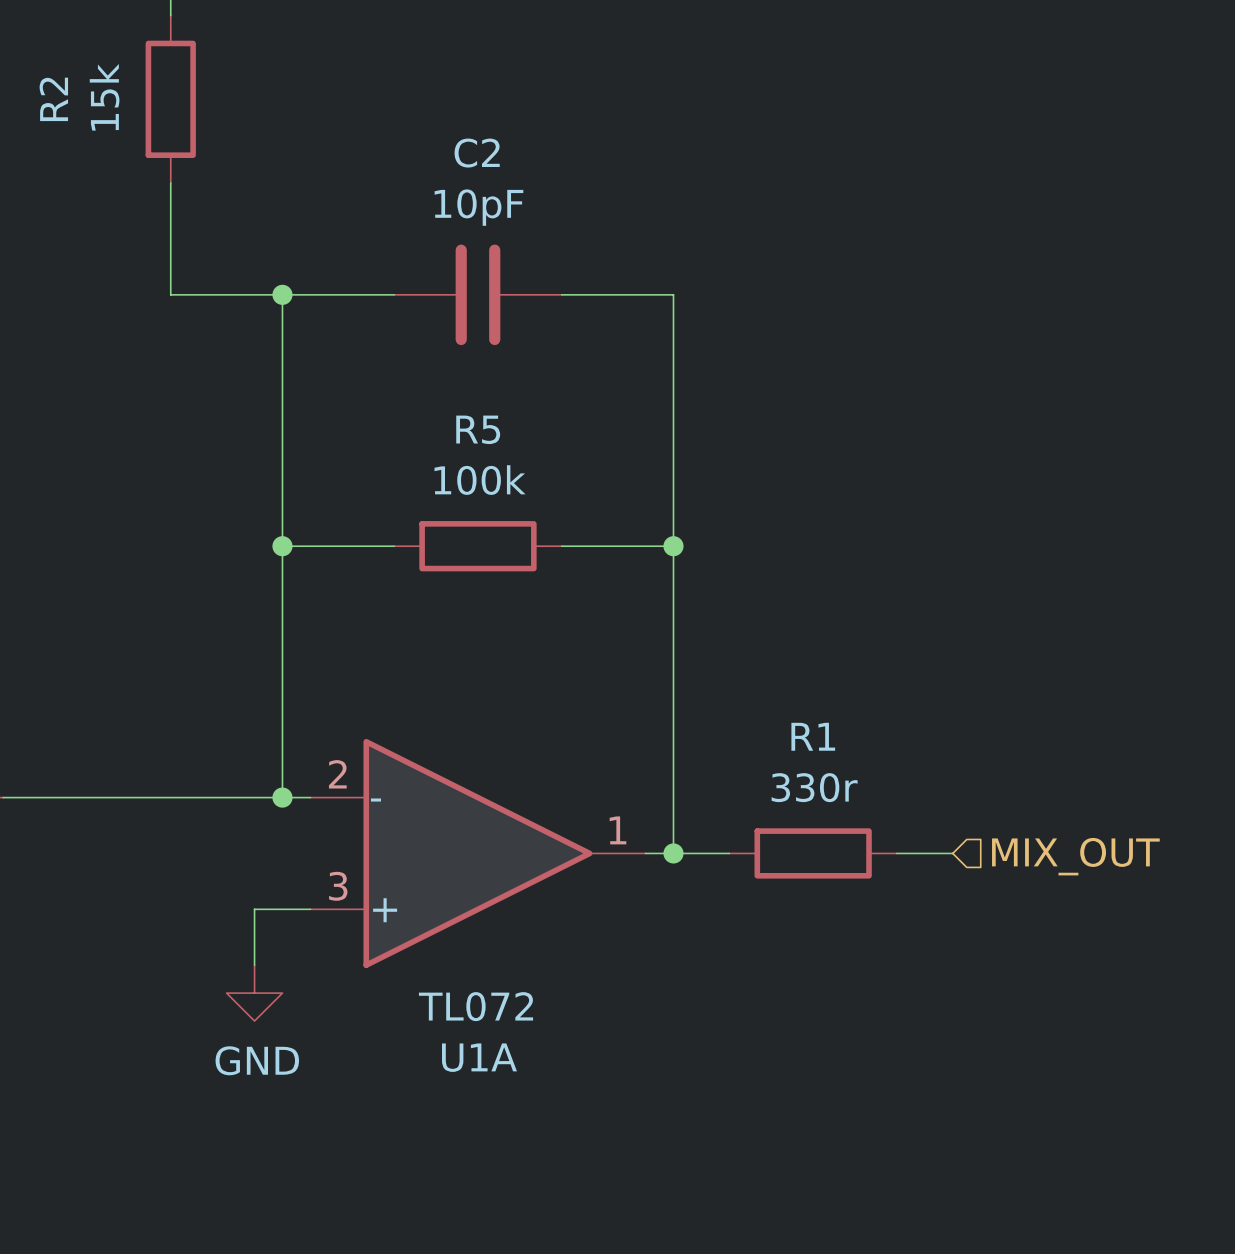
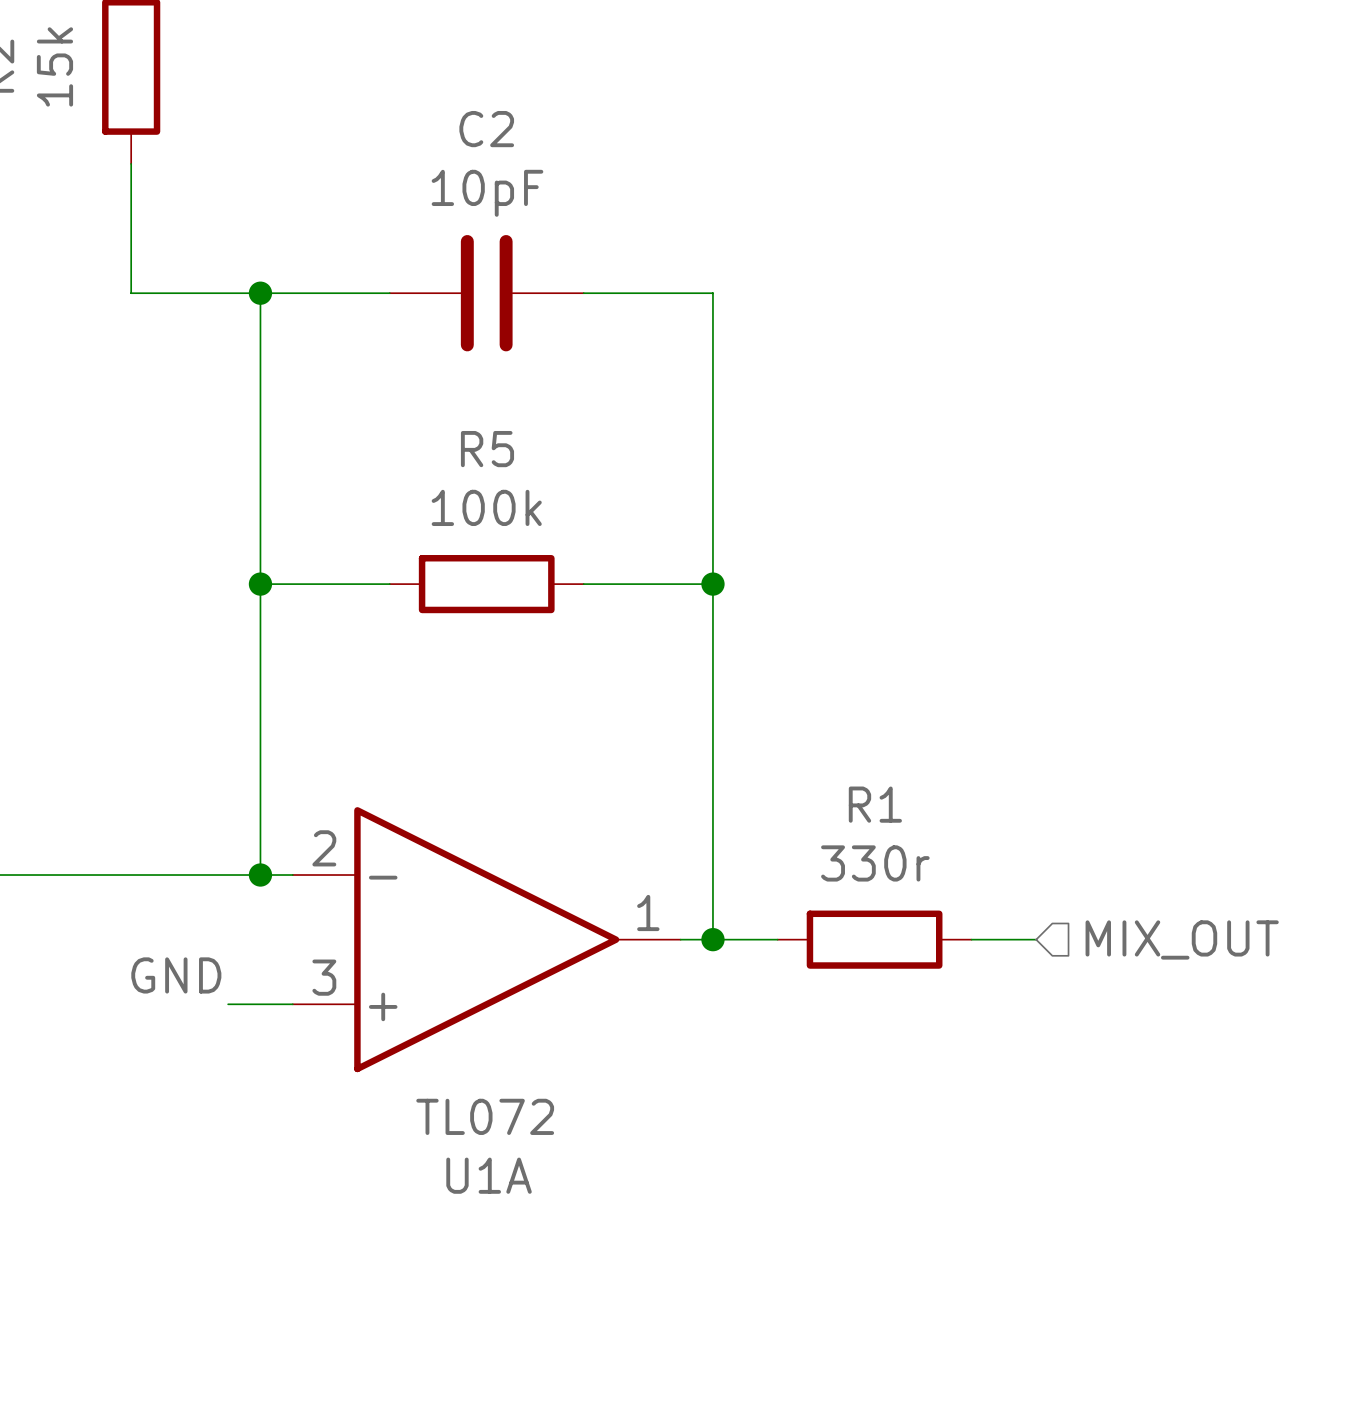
label: none -> GND (176, 975)
wire: (254, 909) (254, 965) -> none
power symbol: GND (254, 993) -> none

